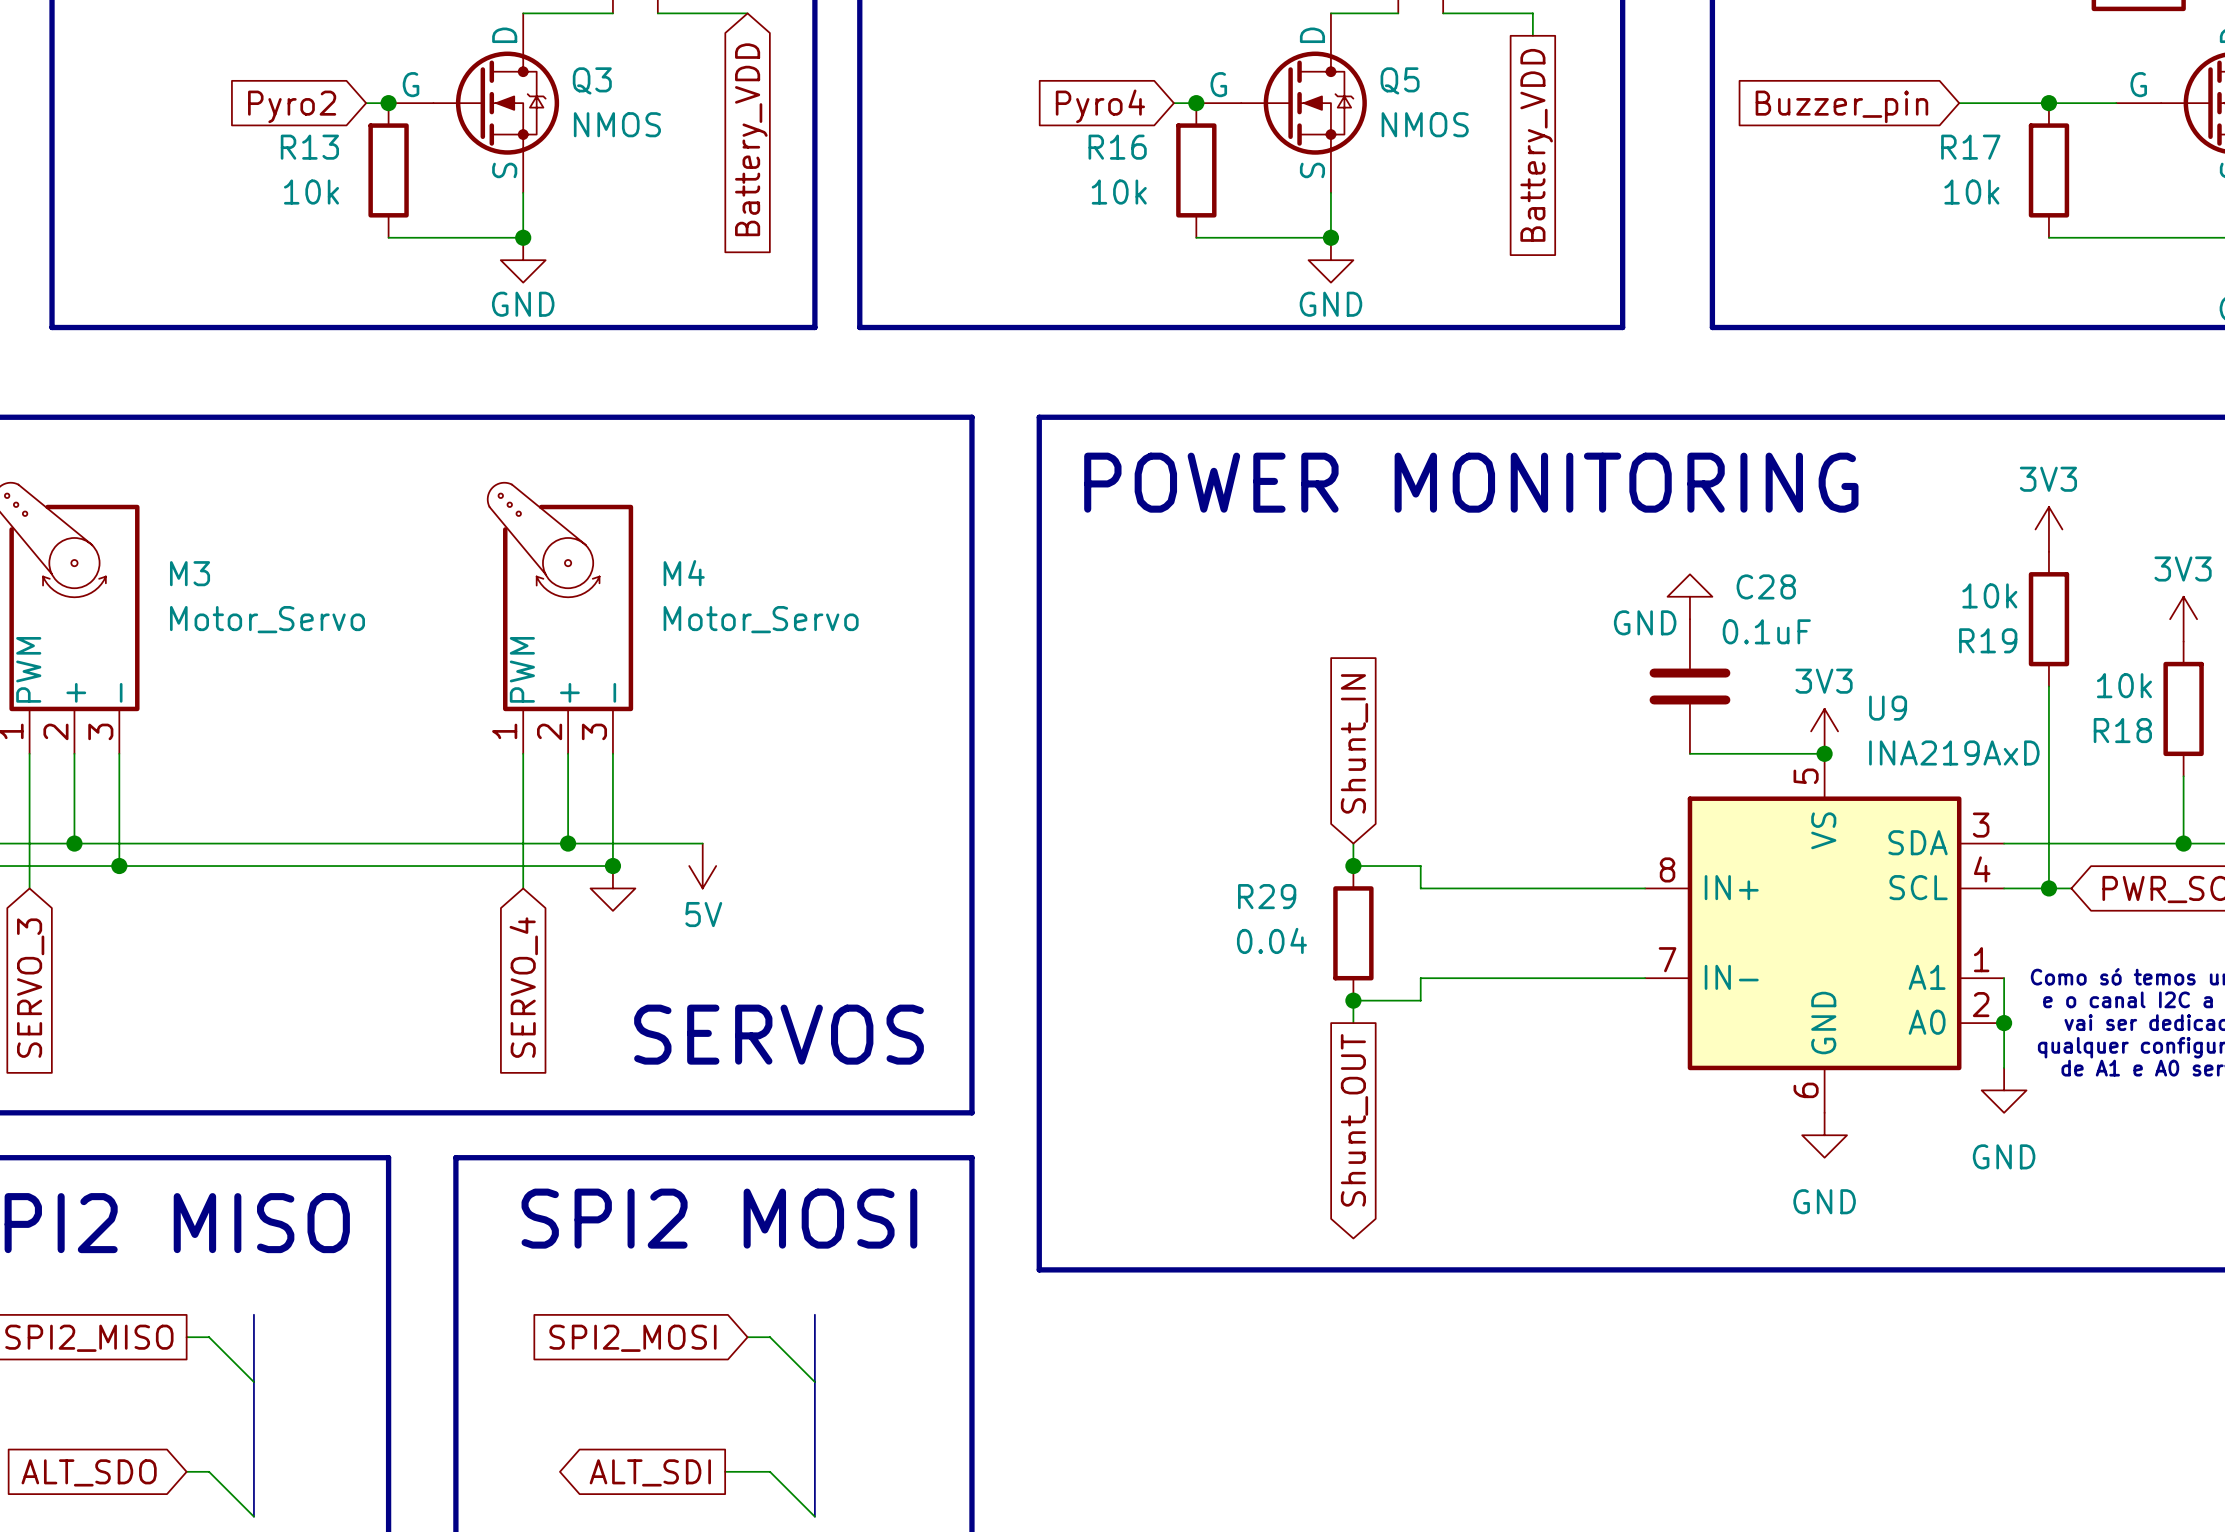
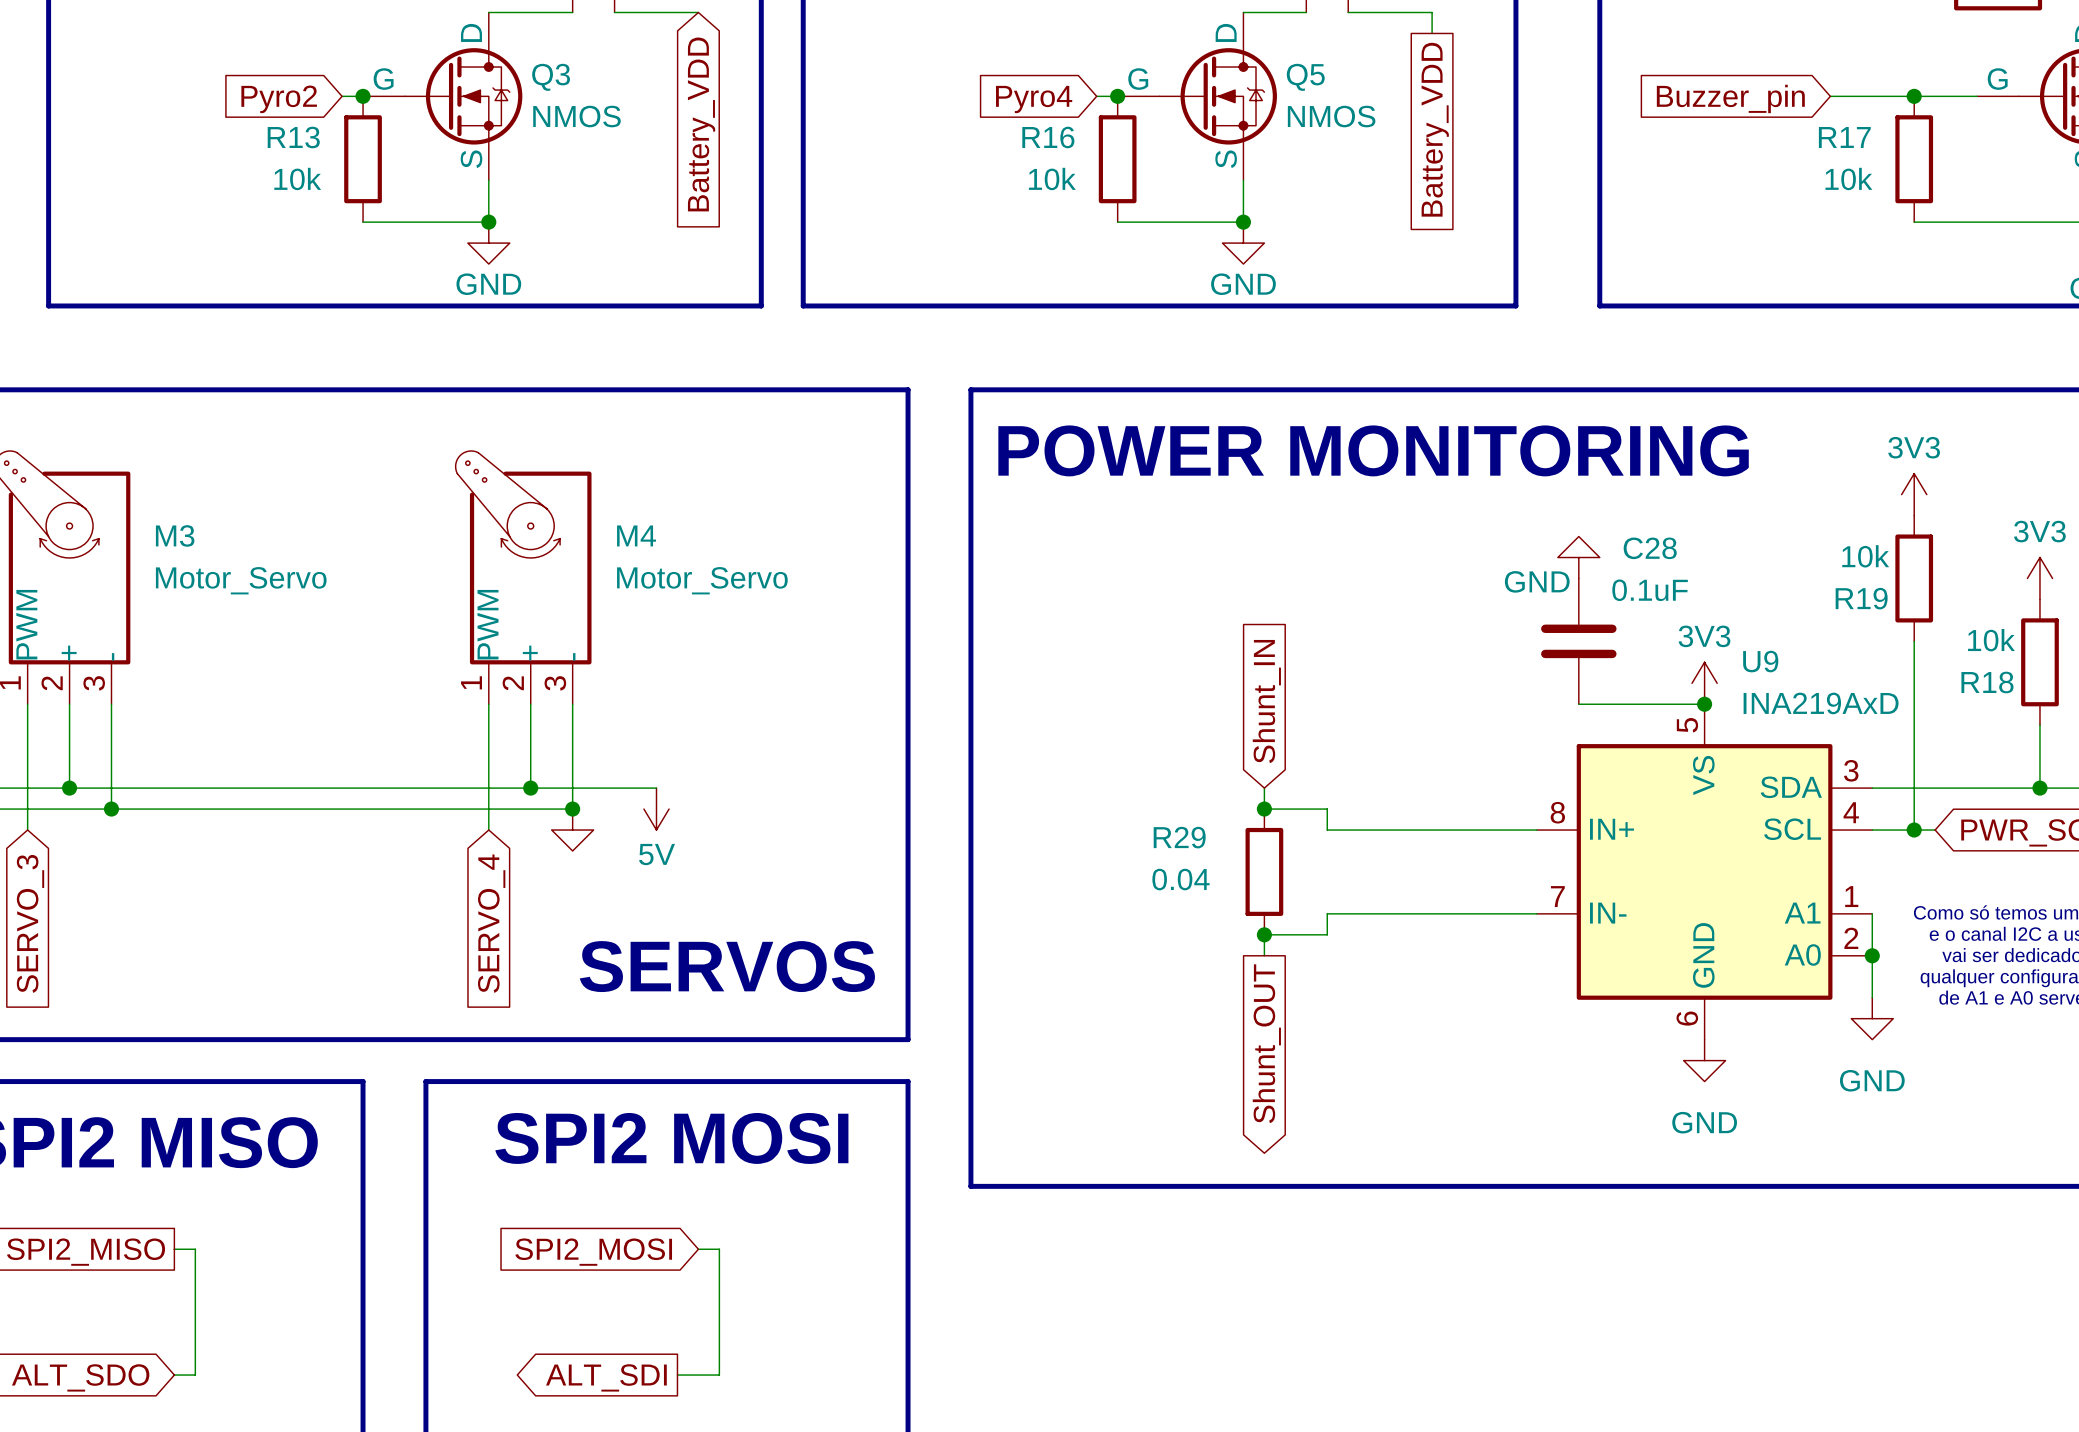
bus: (253, 1314) (253, 1516) -> none
bus: (814, 1314) (814, 1516) -> none
wire: (209, 1337) (253, 1382) -> (195, 1249) (195, 1375)
wire: (770, 1337) (814, 1382) -> (719, 1249) (719, 1375)
wire: (209, 1471) (253, 1516) -> none
wire: (770, 1471) (814, 1516) -> none

